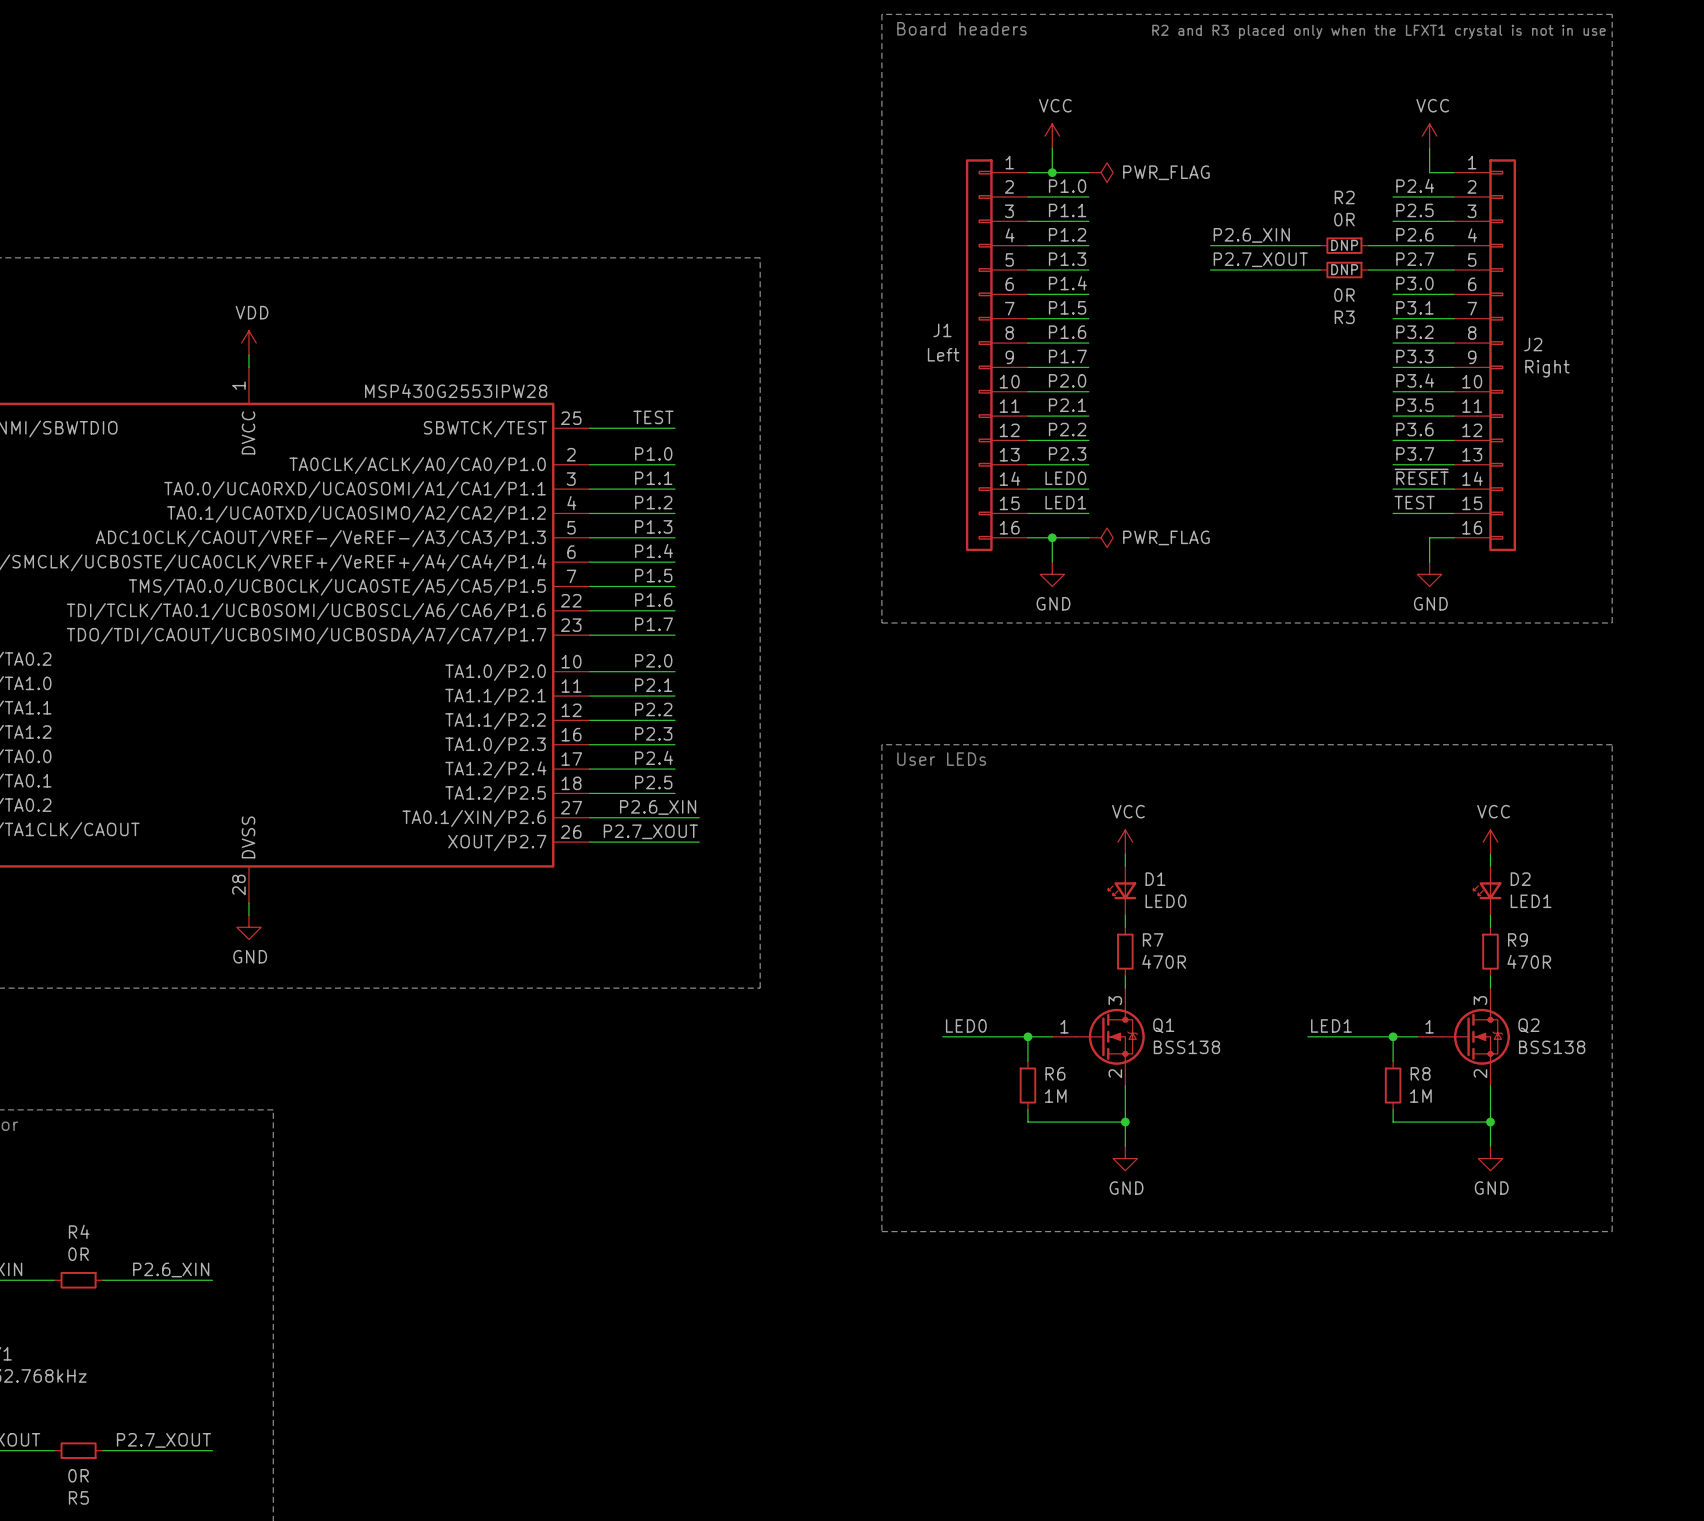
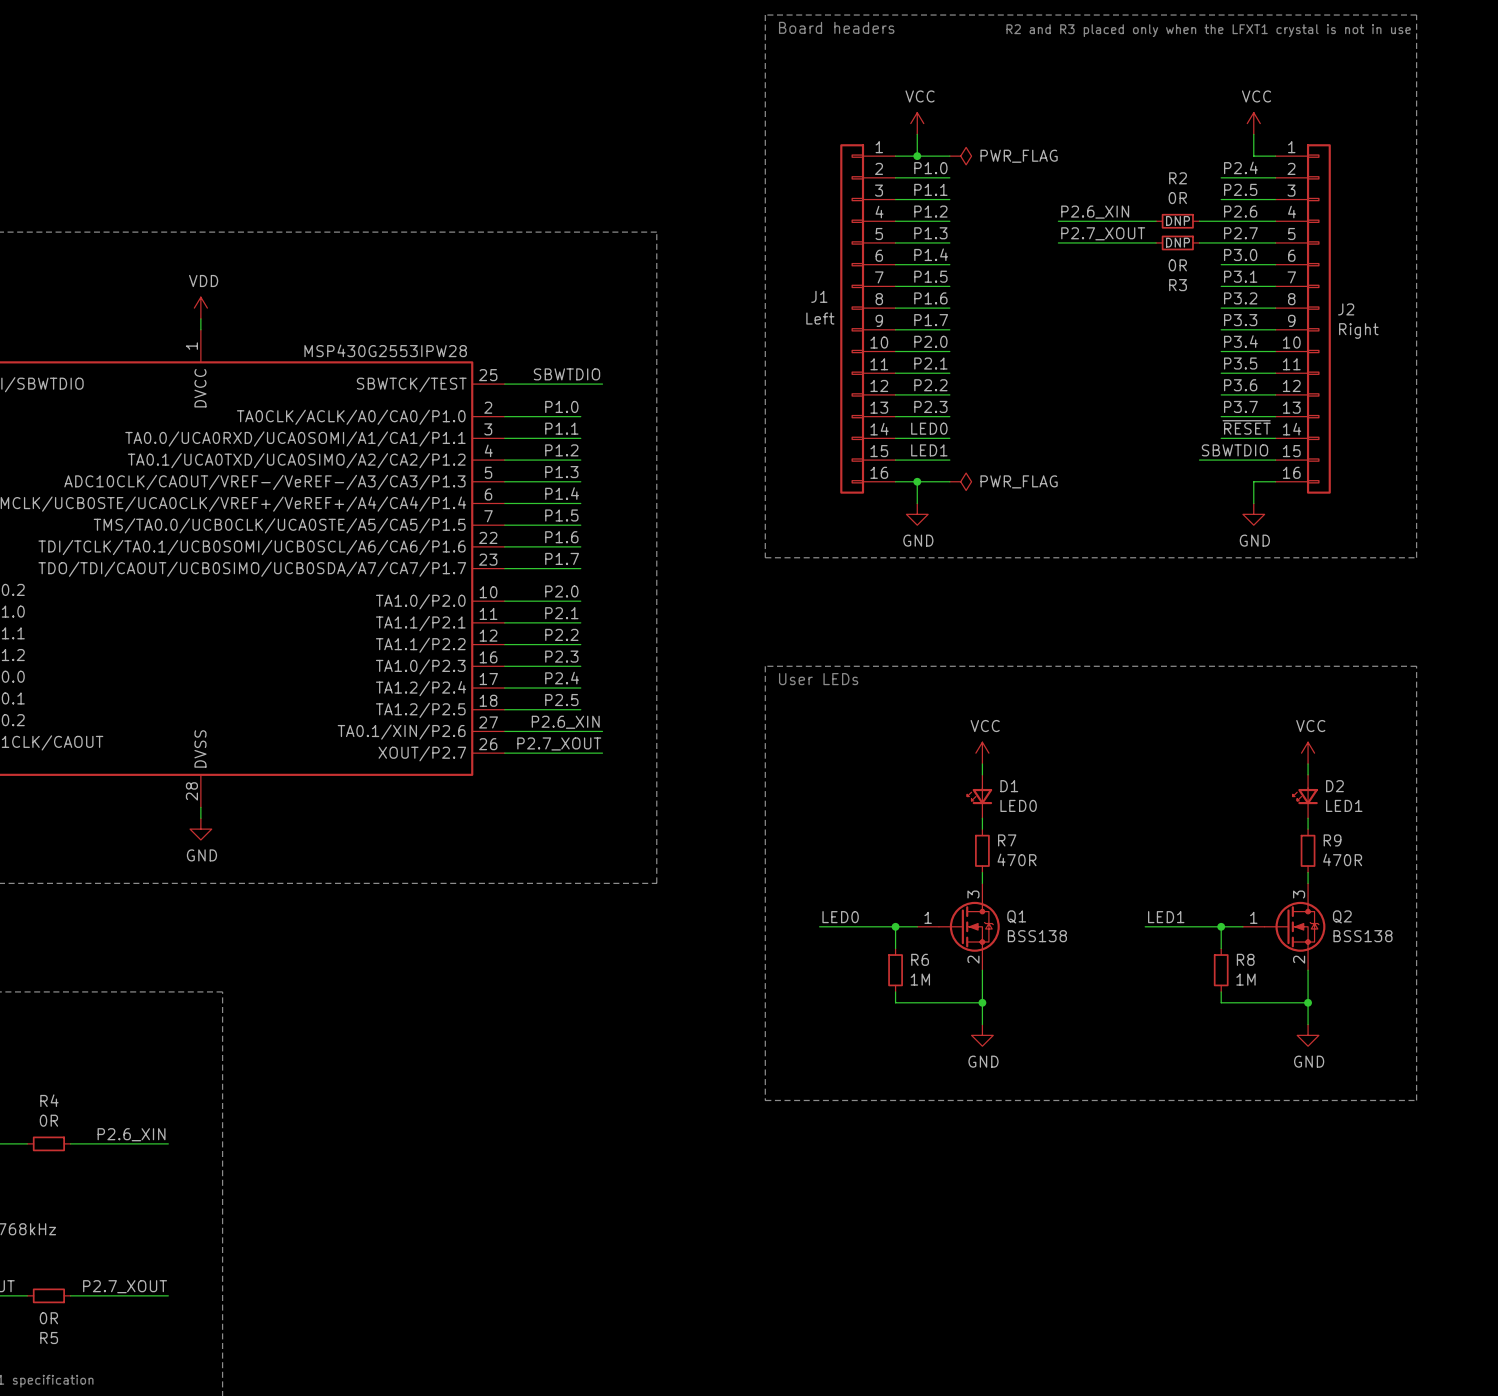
label: TEST (653, 417) -> none
label: none -> SBWTDIO (567, 374)
wire: none -> (580, 384) (602, 384)
label: none -> SBWTDIO (1234, 450)
label: TEST (1414, 502) -> none
wire: none -> (1199, 460) (1221, 460)

